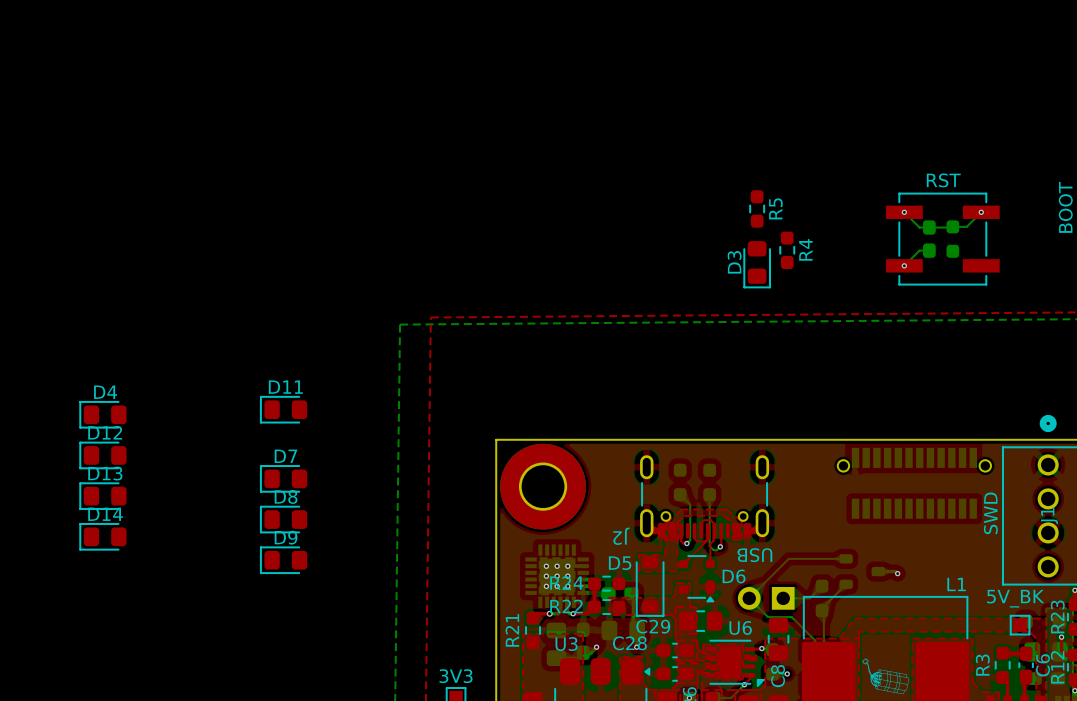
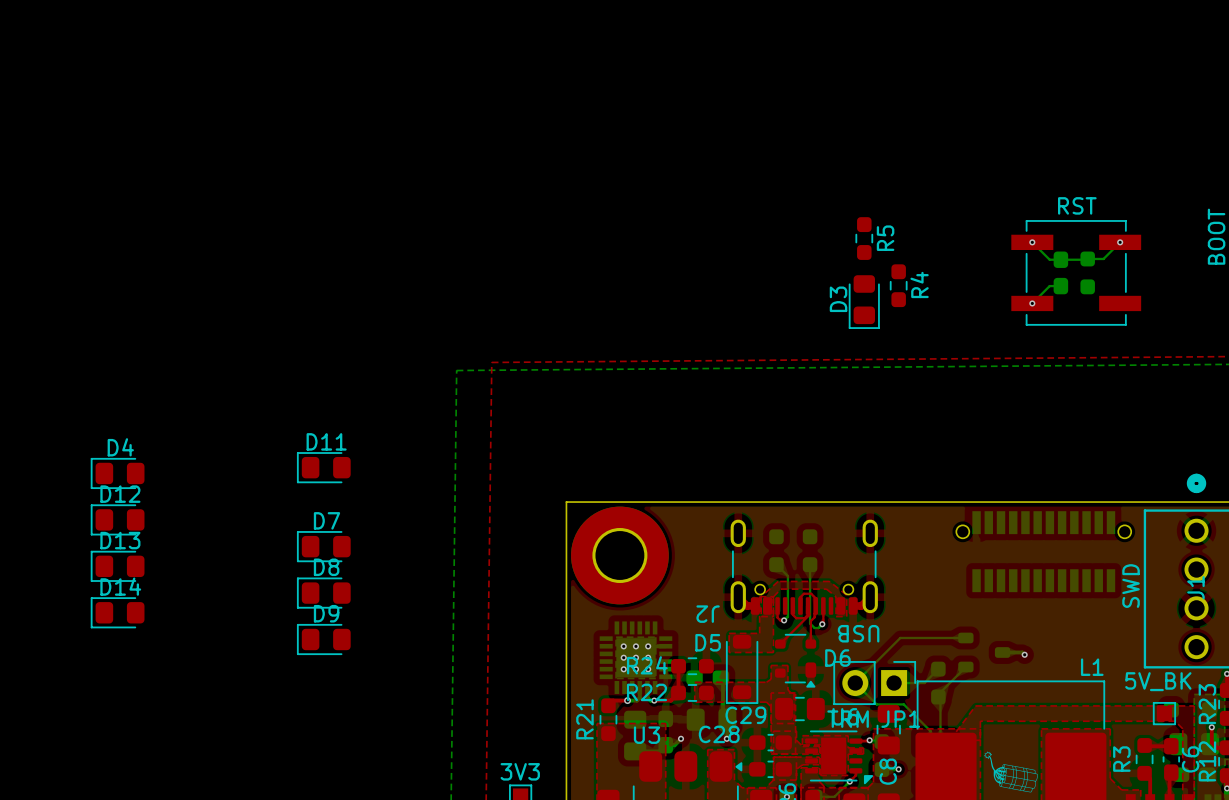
JP1 side: bottom (766, 598) -> top (874, 683)

